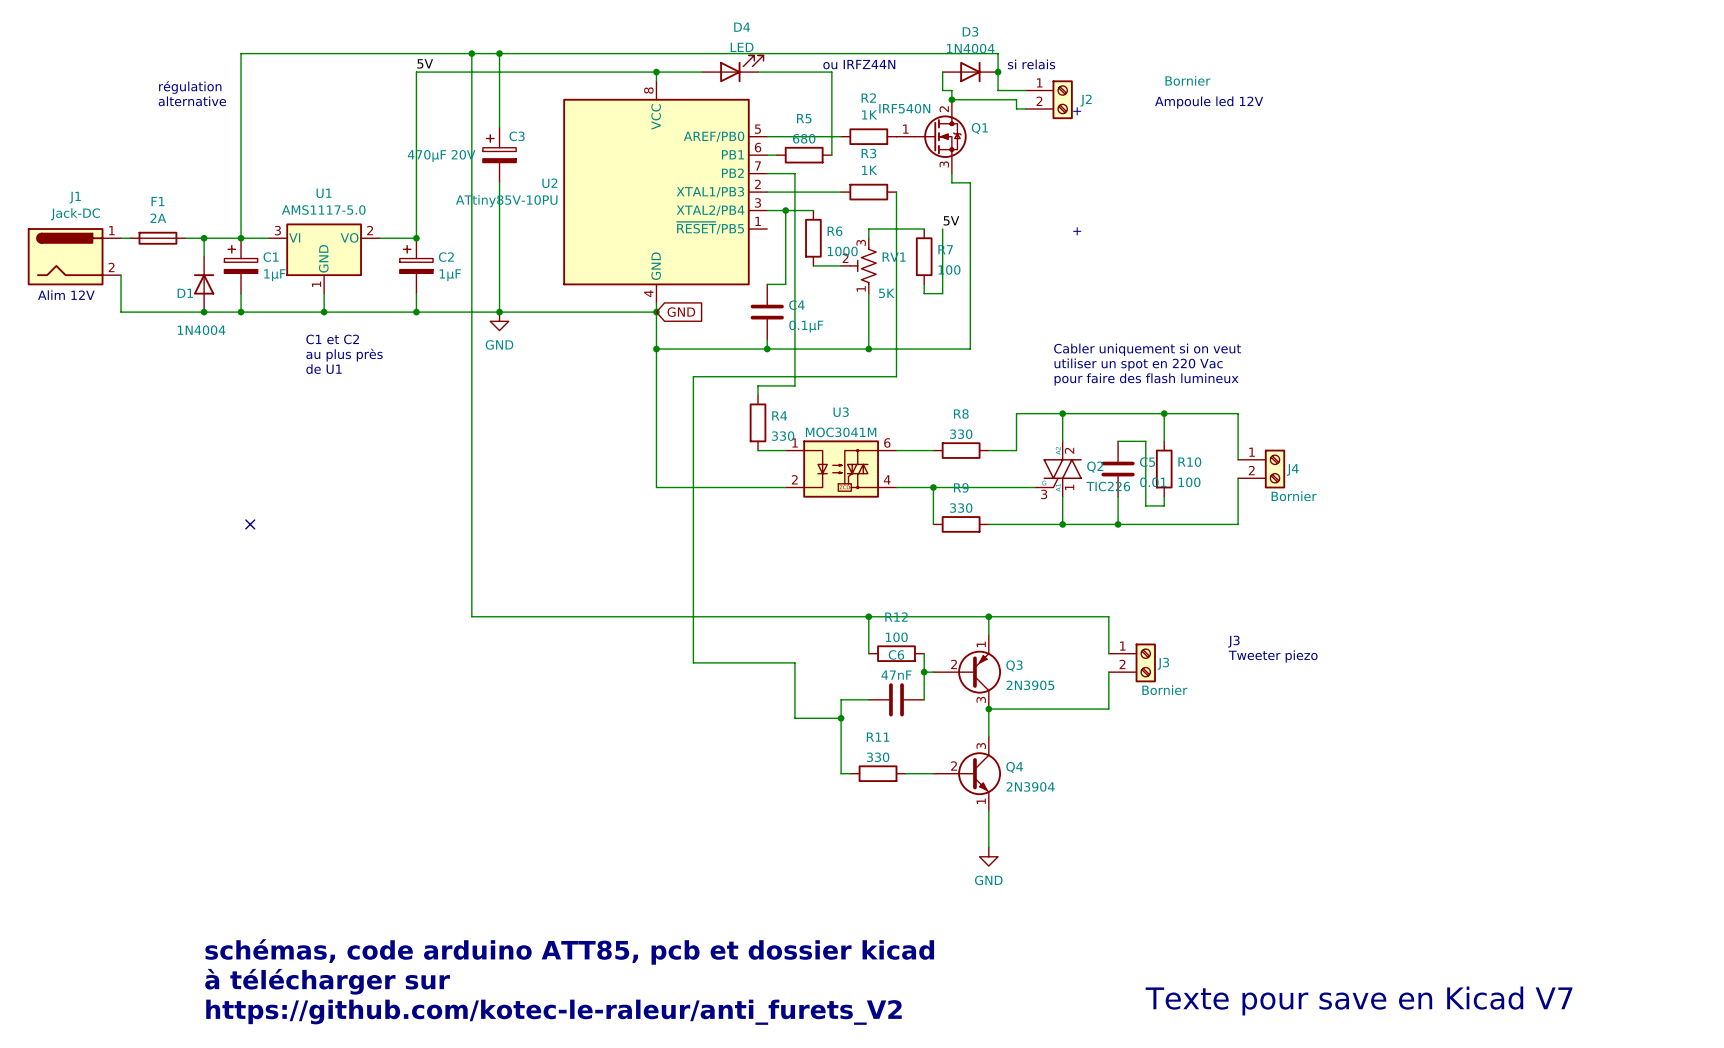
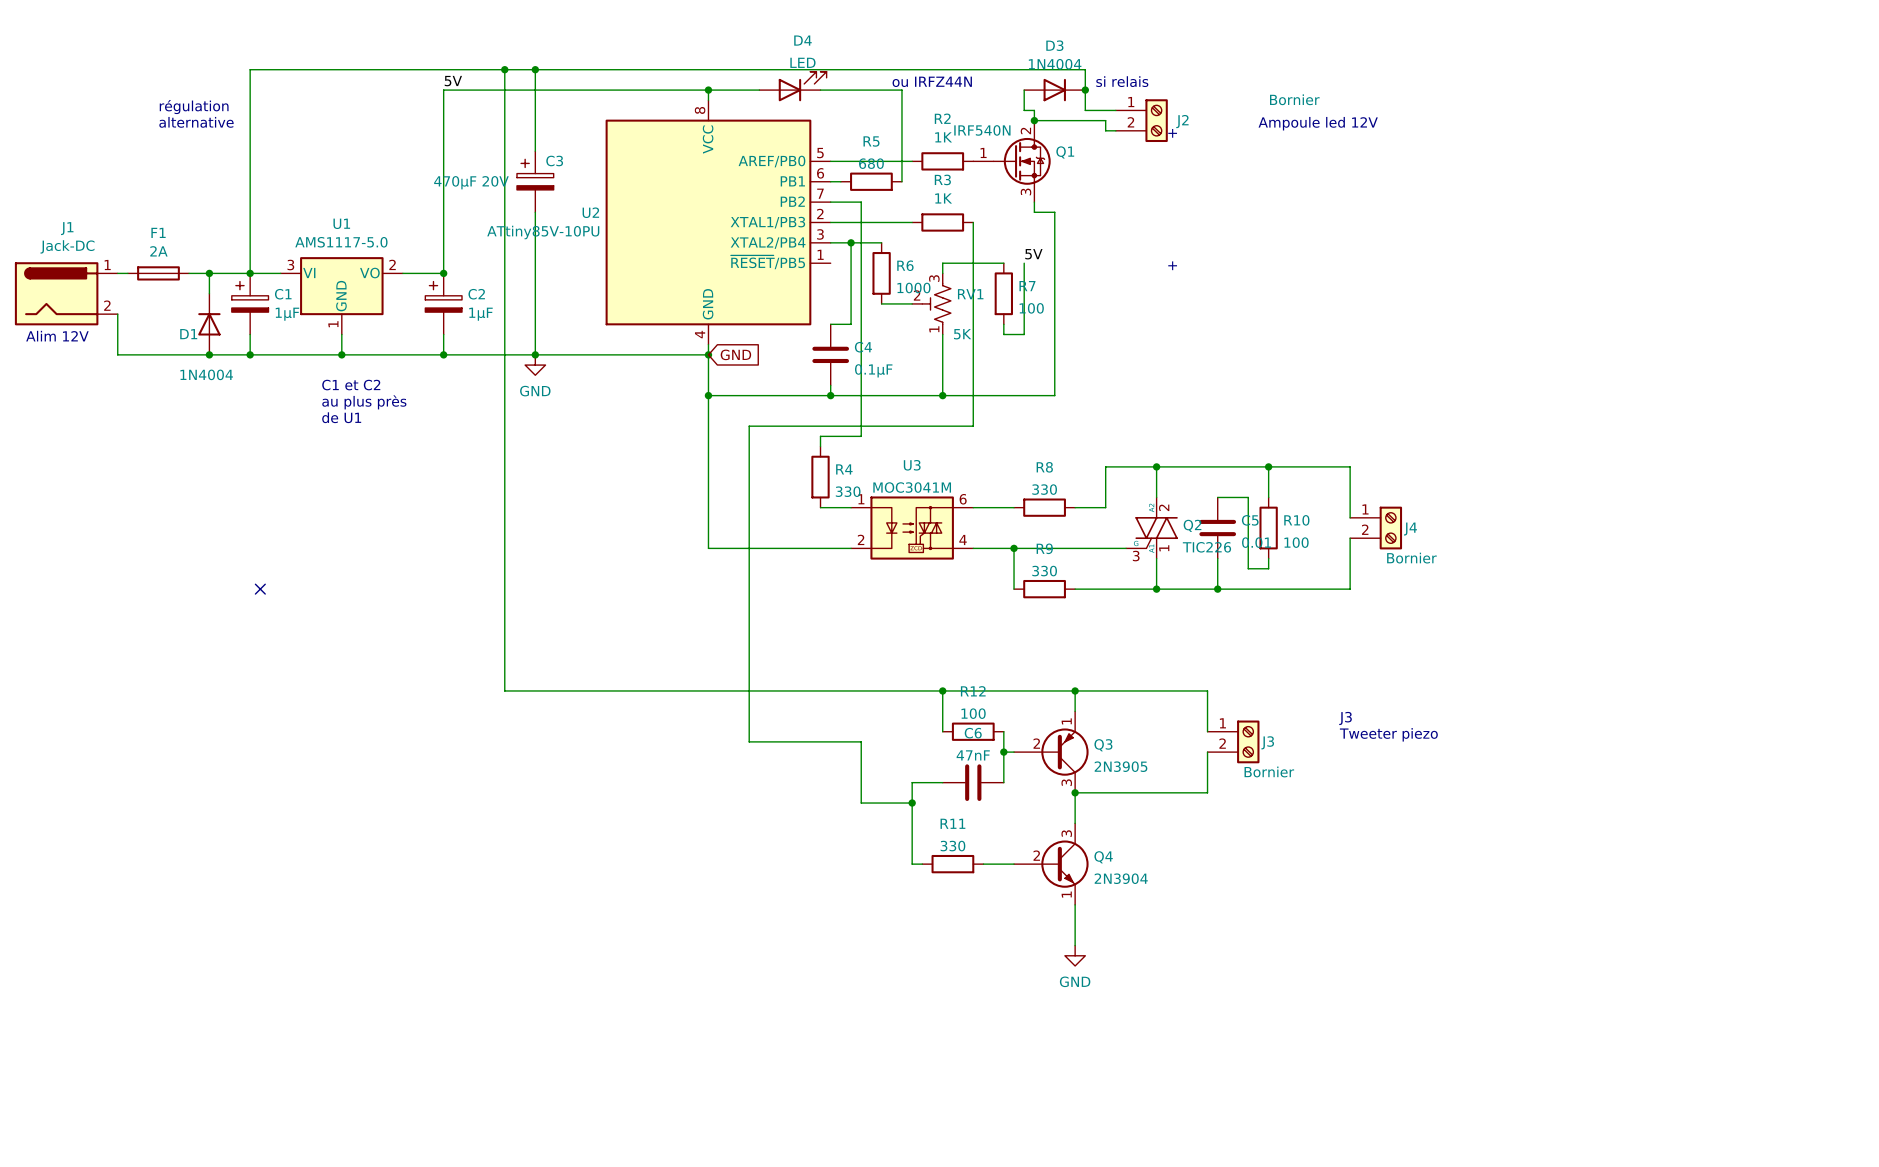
text: Cabler uniquement si on veut (1147, 349) -> none
text: utiliser un spot en 220 Vac (1138, 364) -> none
text: pour faire des flash lumineux (1146, 379) -> none
text: schémas, code arduino ATT85, pcb et dossier kicad (569, 951) -> none
text: à télécharger sur (327, 981) -> none
text: Texte pour save en Kicad V7 (1359, 1000) -> none
text: https://github.com/kotec-le-raleur/anti_furets_V2 (553, 1012) -> none

